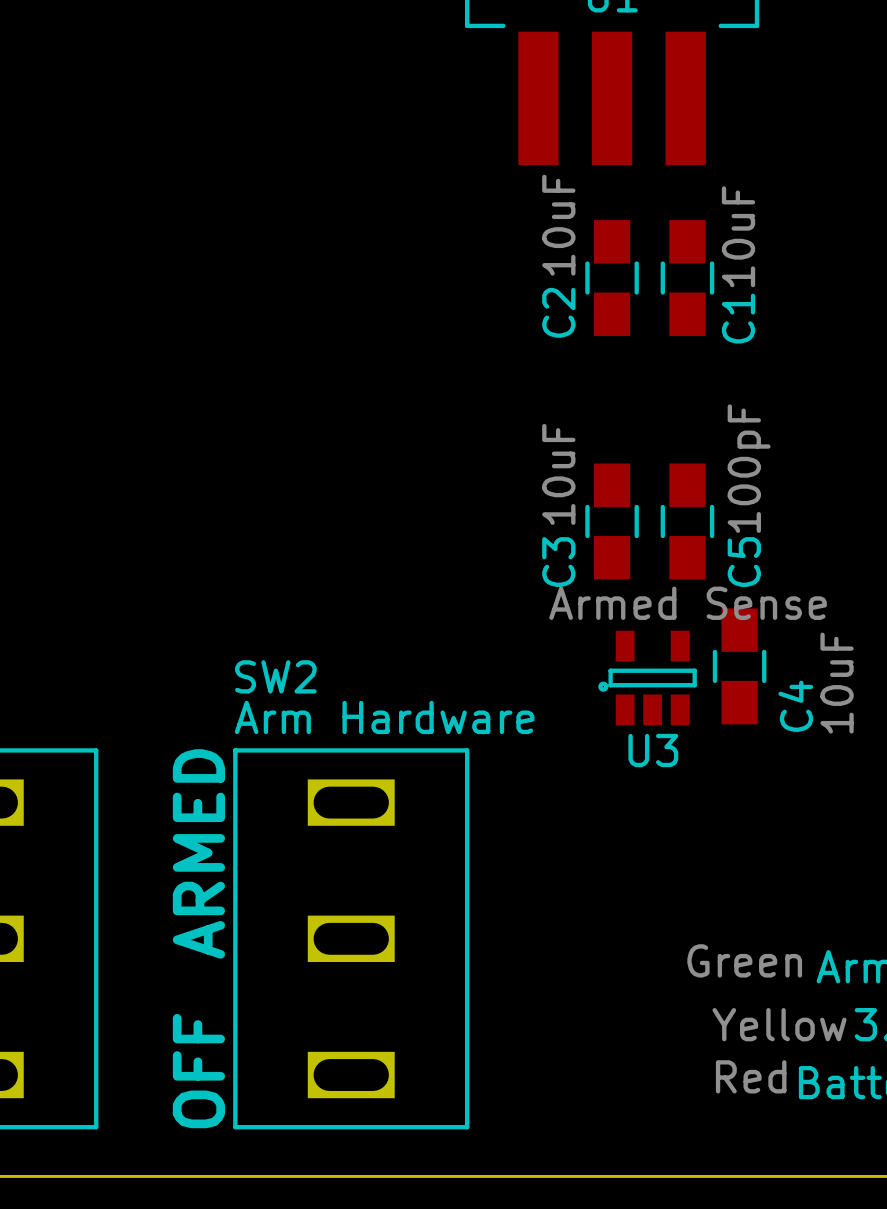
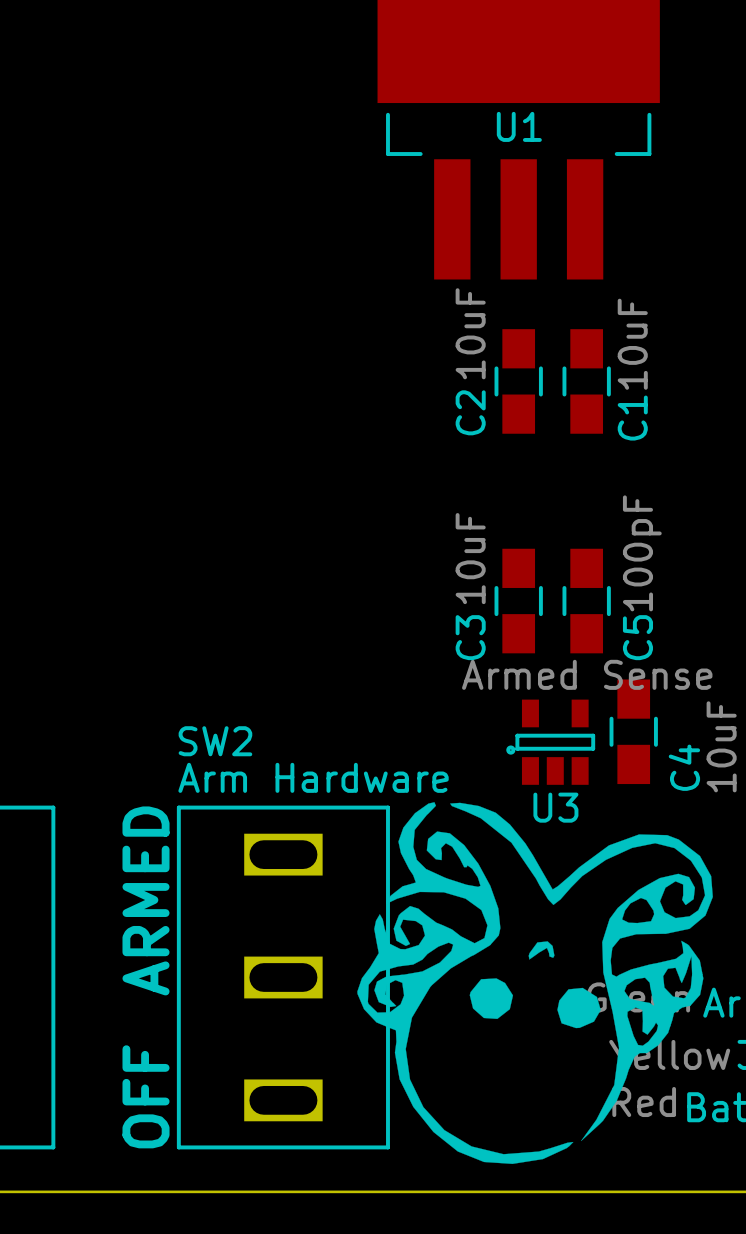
drawing: none -> [357, 802, 713, 1164]

